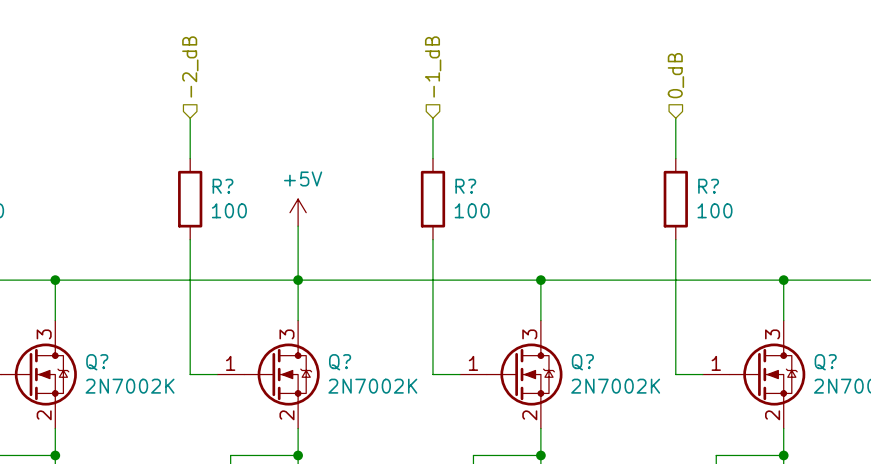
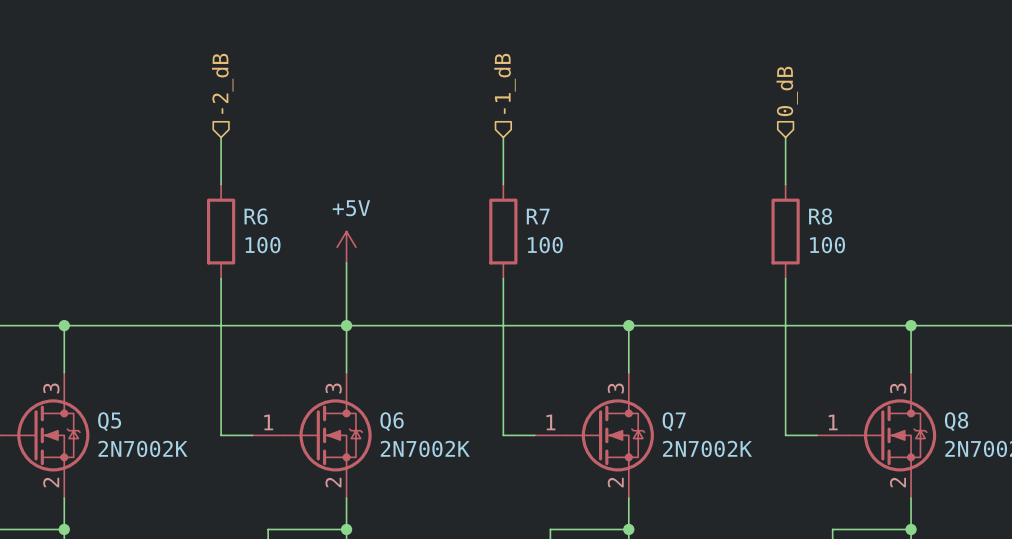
R? name: R? (222, 186) -> R6 (256, 216)
R? name: R? (465, 186) -> R7 (538, 216)
R? name: R? (708, 186) -> R8 (820, 216)
Q? name: Q? (97, 362) -> Q5 (109, 421)
Q? name: Q? (340, 362) -> Q6 (392, 421)
Q? name: Q? (582, 362) -> Q7 (674, 421)
Q? name: Q? (825, 362) -> Q8 (956, 421)

